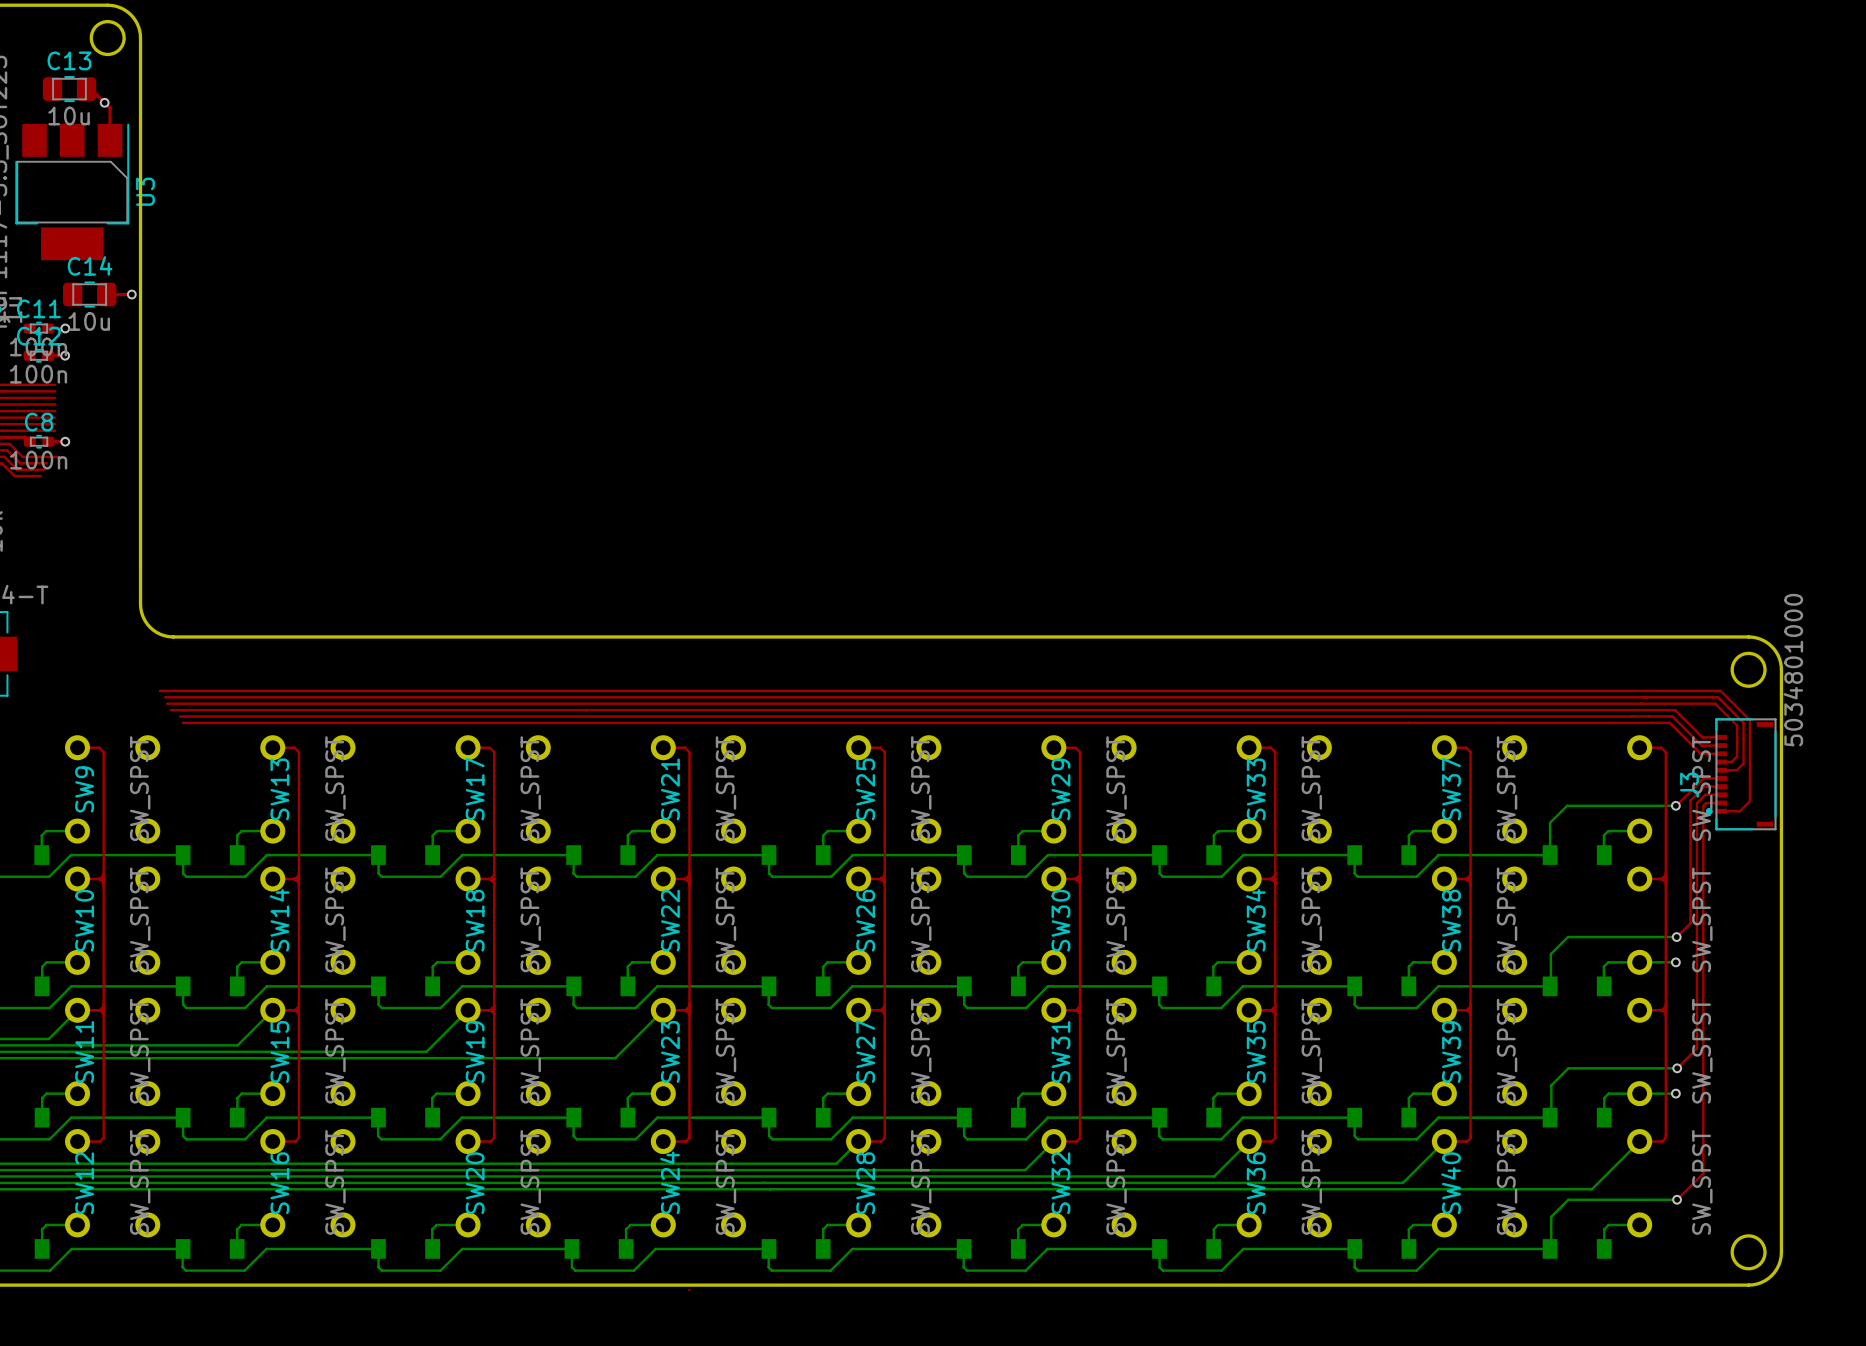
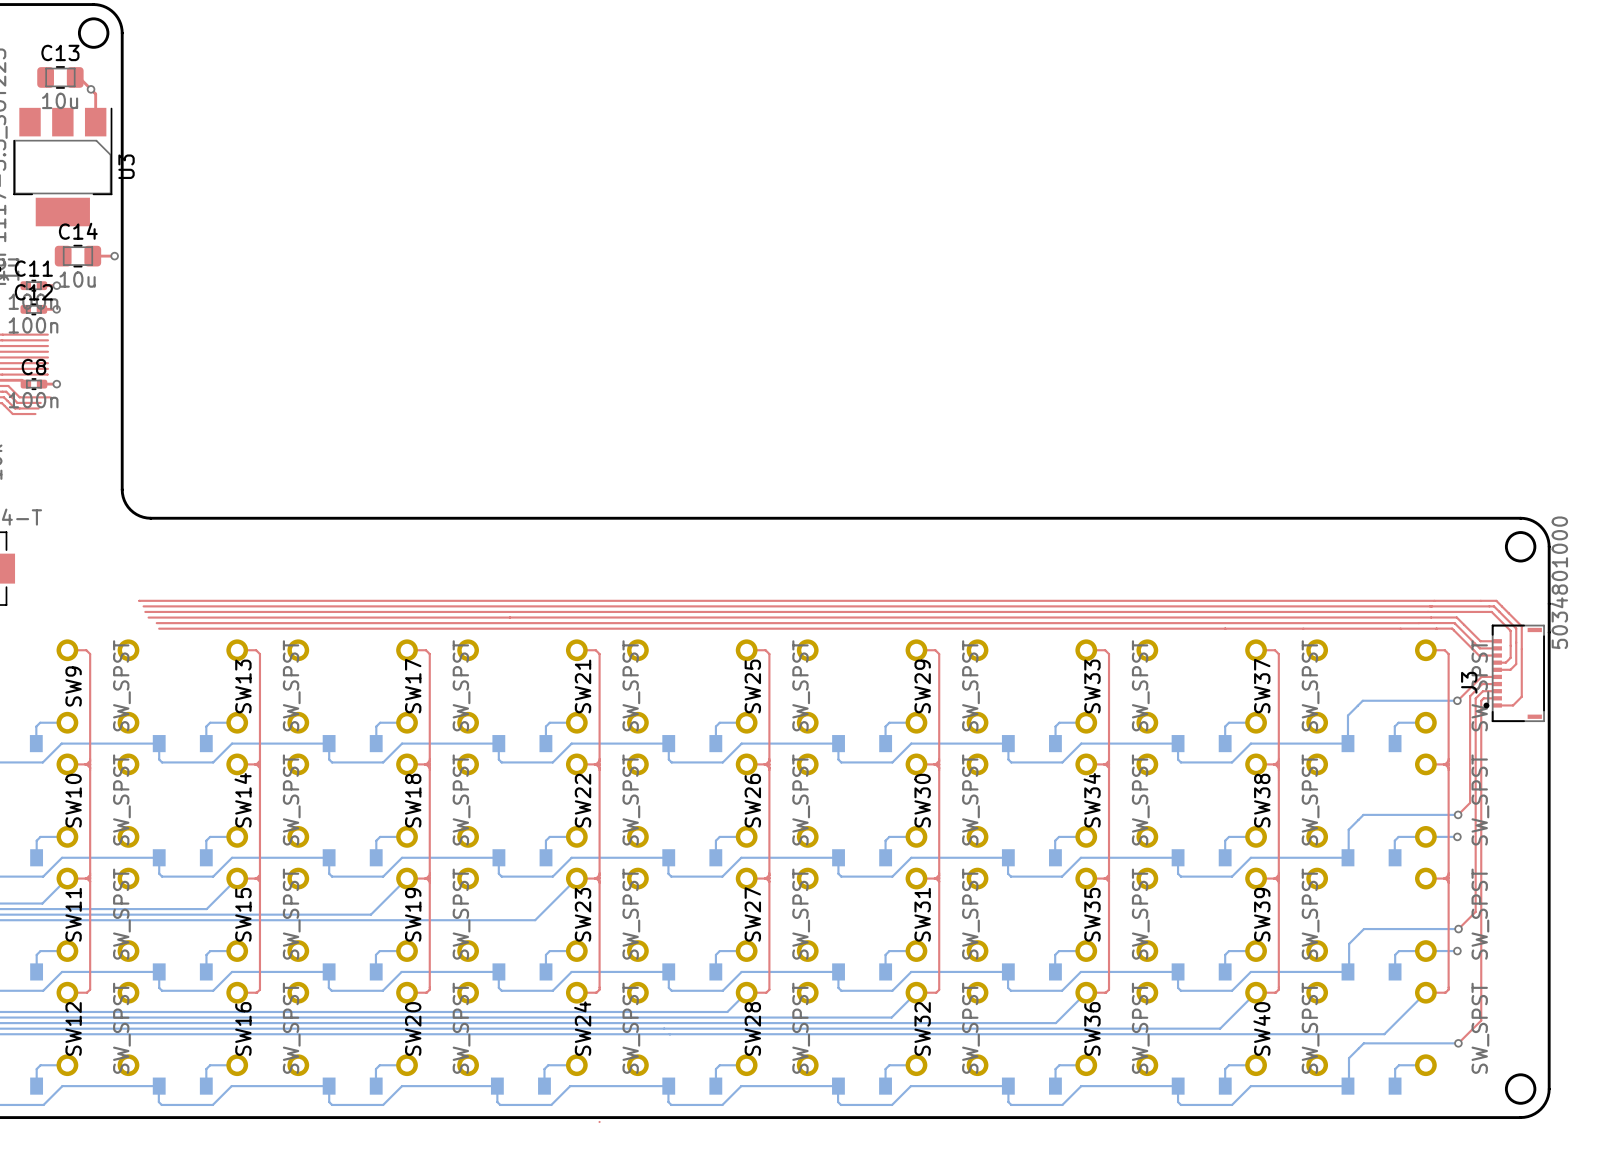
board edge: (140, 563) (140, 604) (143, 616) (153, 630) (164, 635) (173, 636) (1748, 636) (1762, 640) (1771, 646) (1779, 658) (1781, 669) -> (122, 489) (124, 500) (130, 509) (139, 516) (150, 518) (1523, 518) (1538, 524) (1547, 537) (1549, 582)
round board edge position: (1748, 669) -> (1520, 546)

